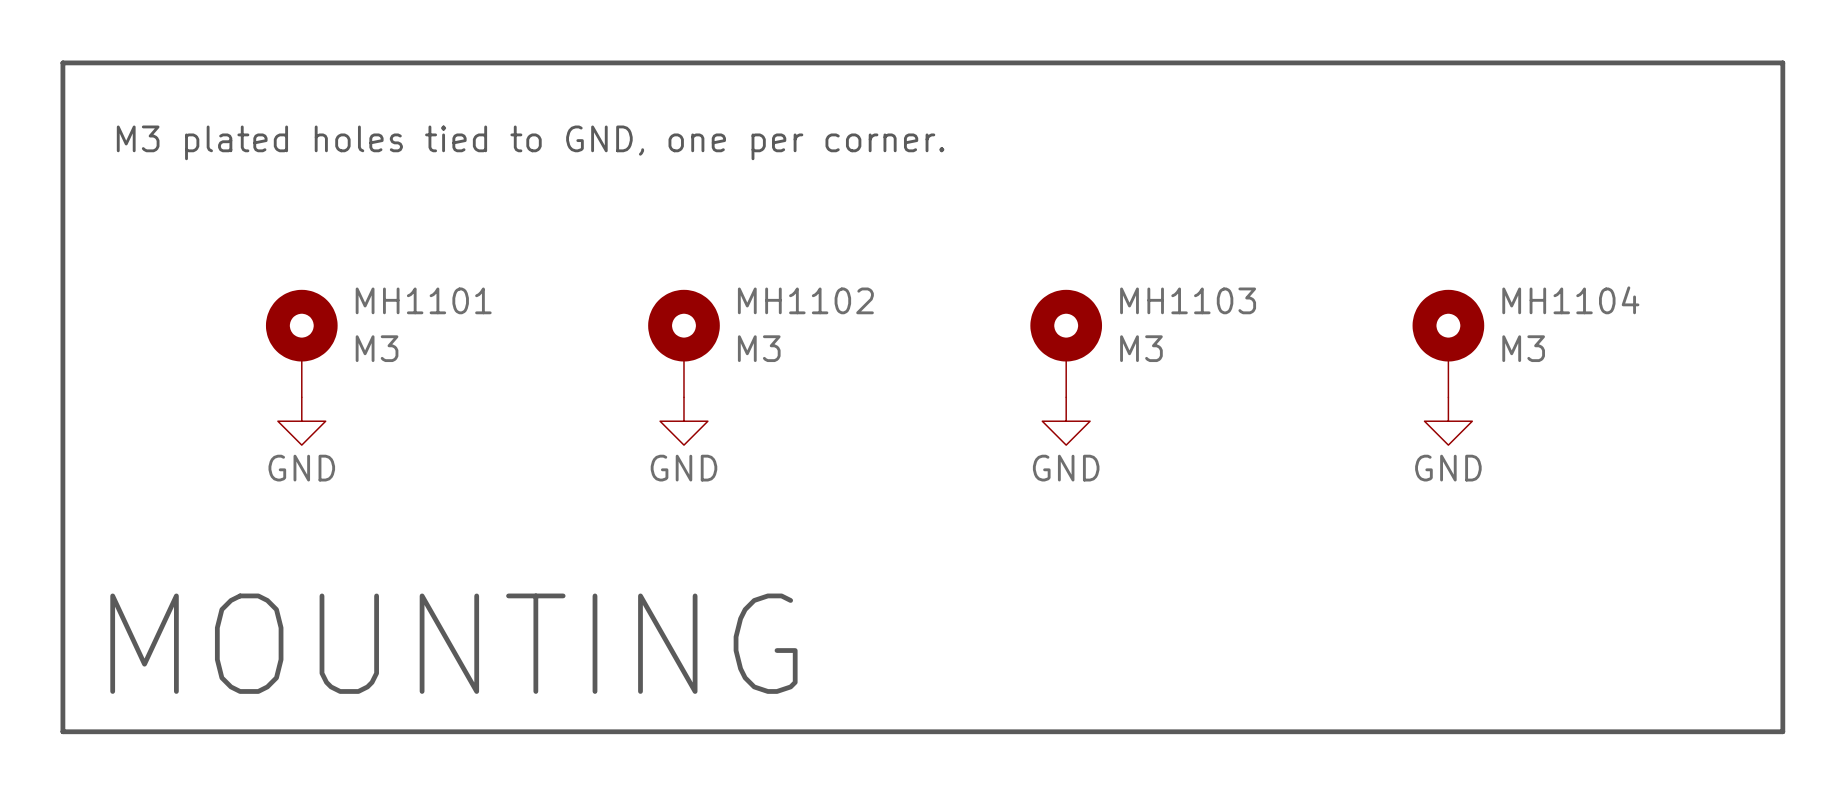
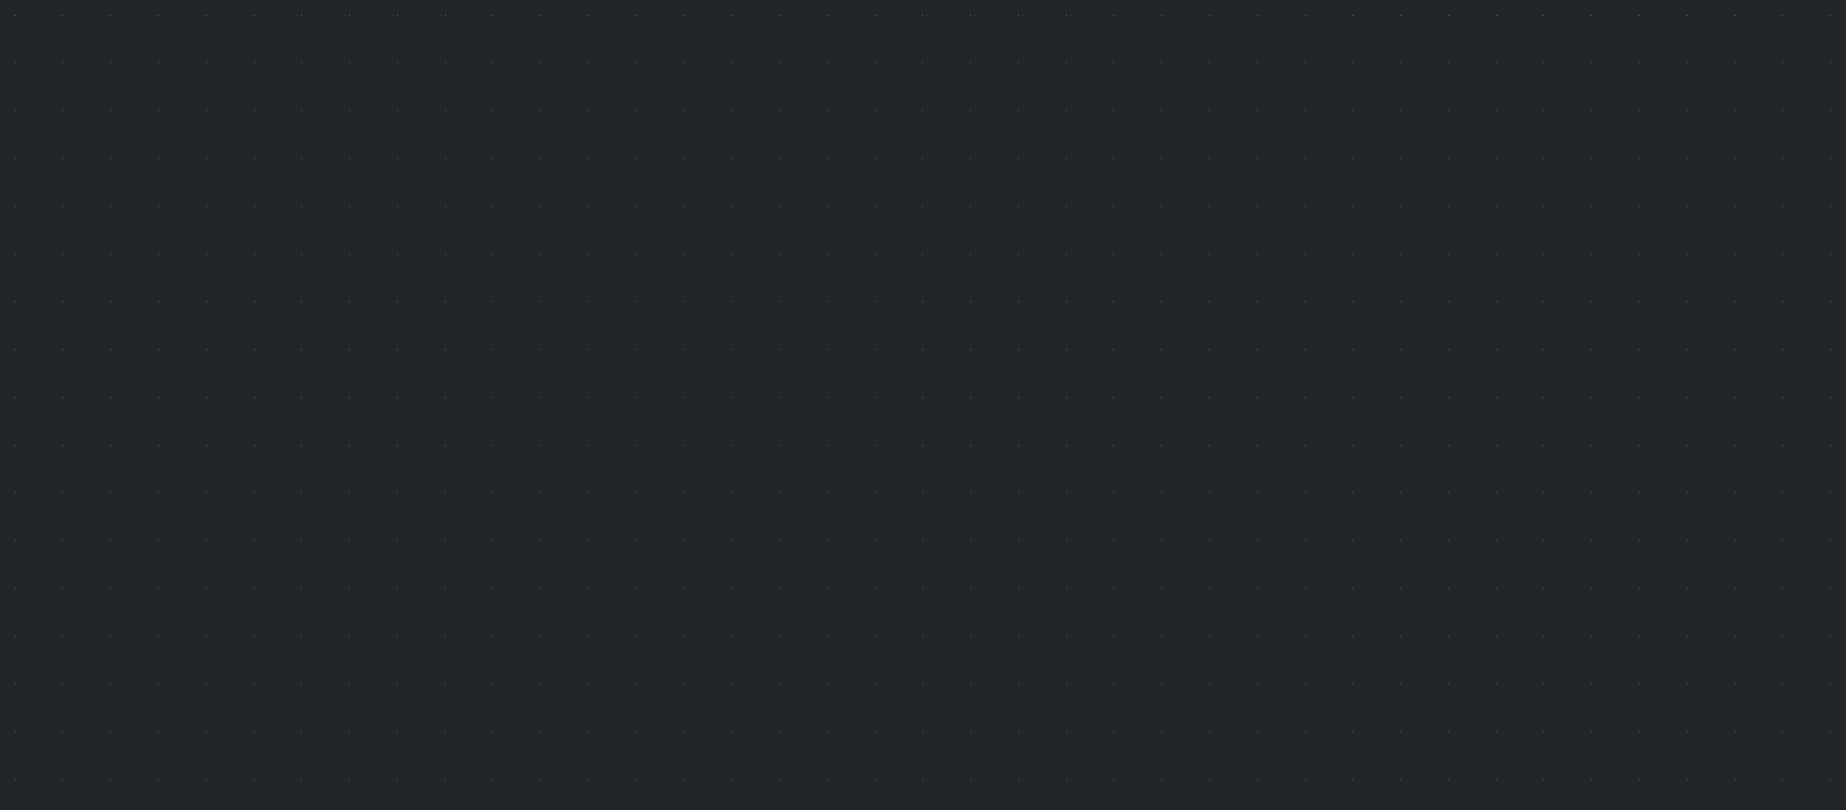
line: (62, 62) (1782, 62) (1782, 731) (62, 731) (62, 62) -> none
text: M3 plated holes tied to GND, one per corner. (530, 142) -> none
MH1101: M3 (301, 343) -> none
MH1102: M3 (683, 343) -> none
MH1103: M3 (1066, 343) -> none
MH1104: M3 (1448, 343) -> none
power symbol: GND (301, 421) -> none
power symbol: GND (683, 421) -> none
power symbol: GND (1066, 421) -> none
power symbol: GND (1448, 421) -> none
text: MOUNTING (453, 643) -> none

